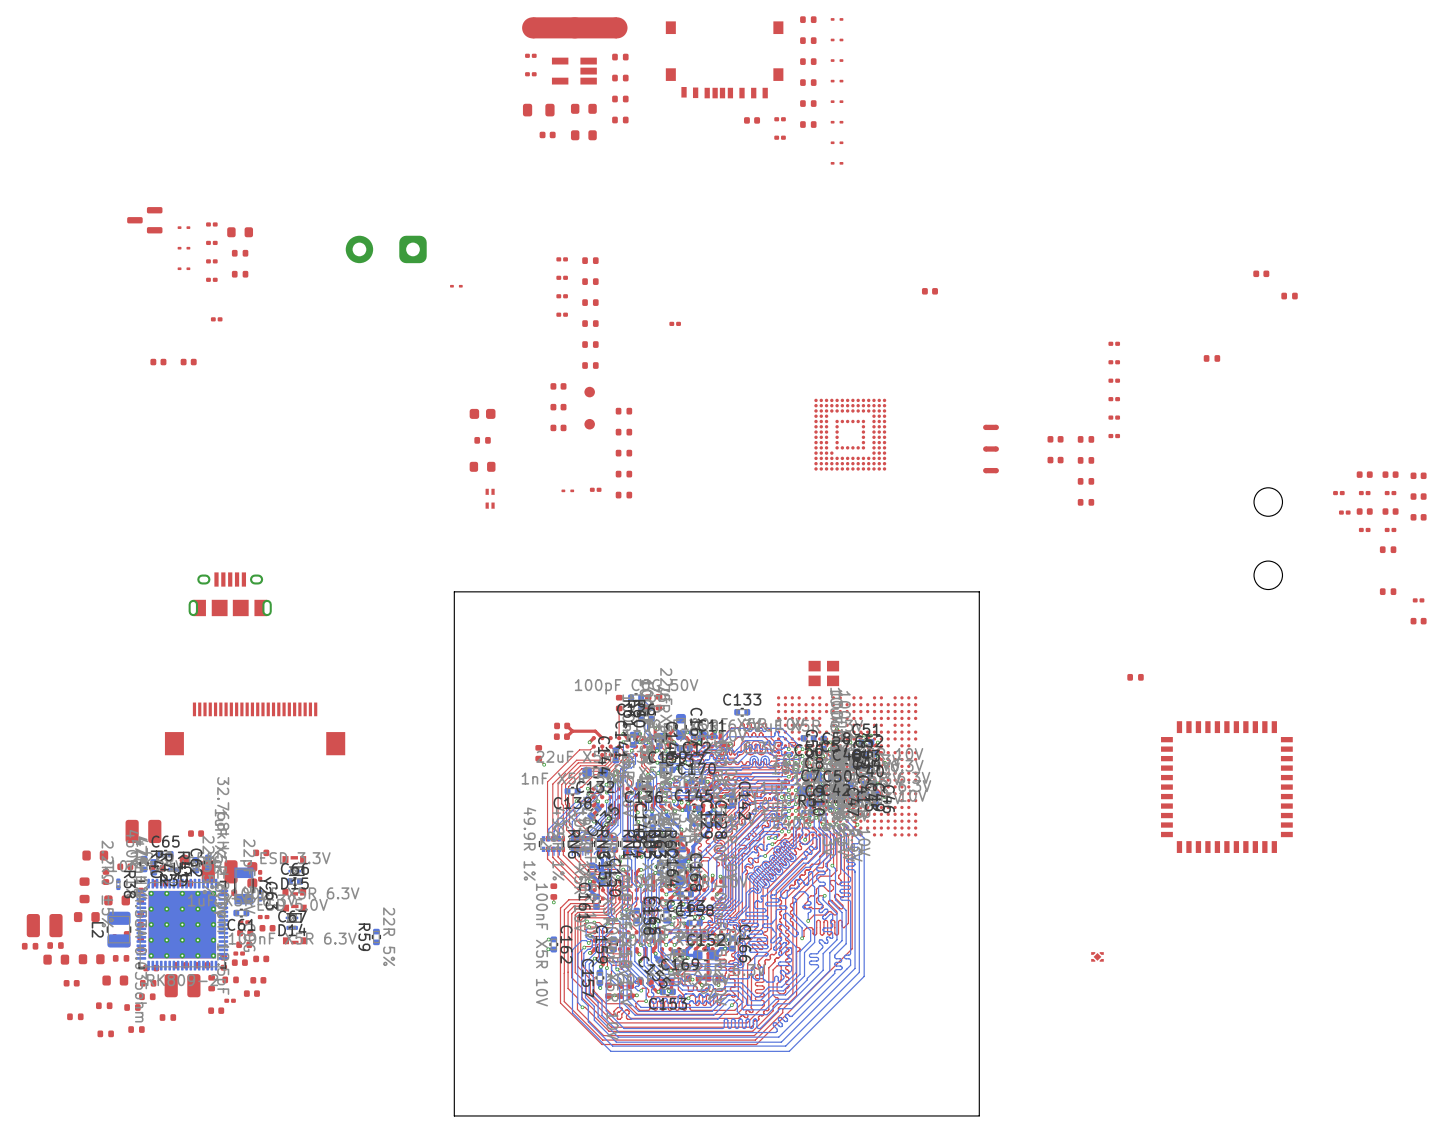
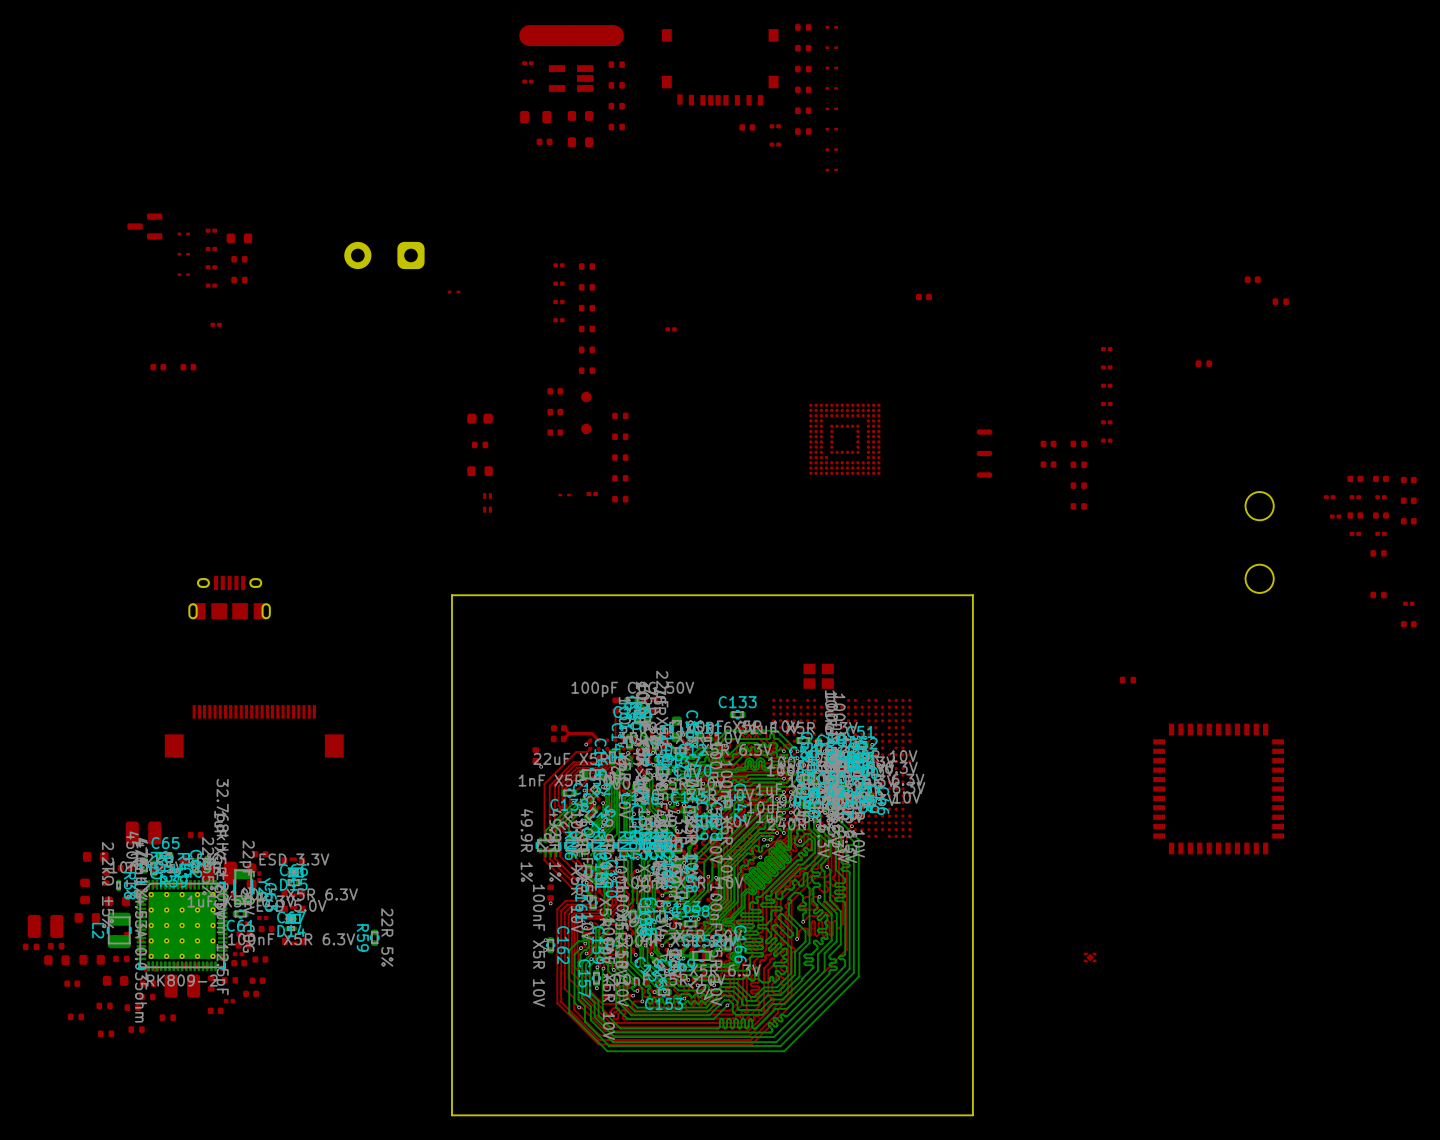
bottom track: (614, 849) (614, 867) (622, 875) (622, 915) -> none

